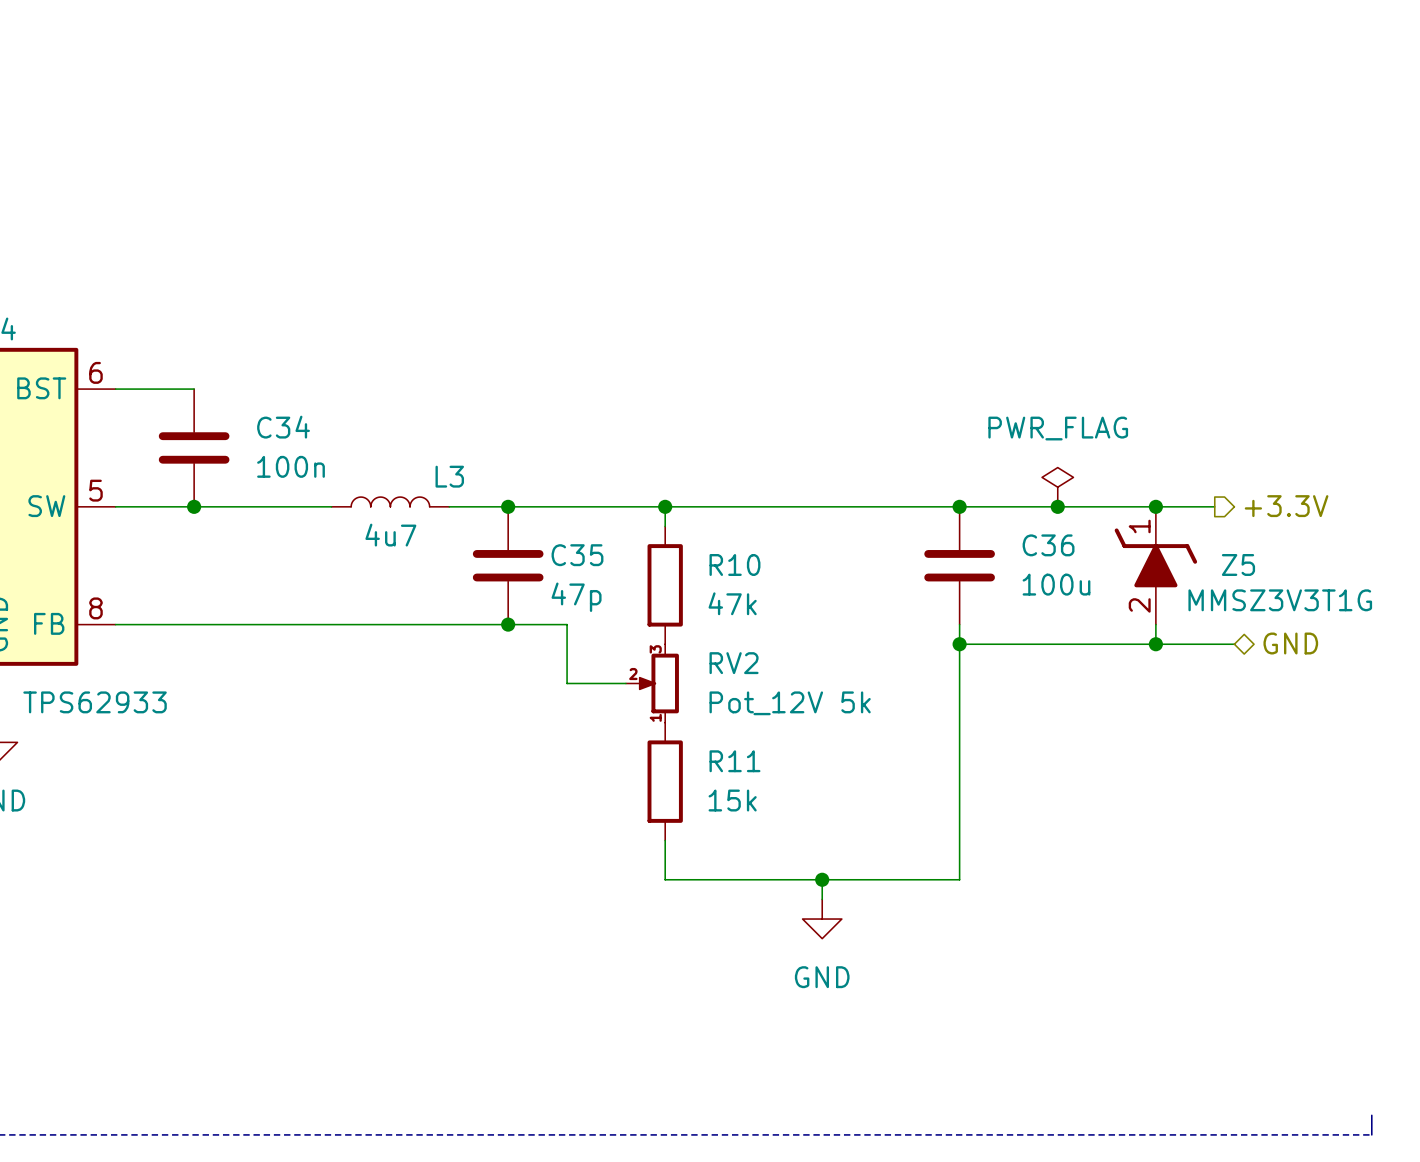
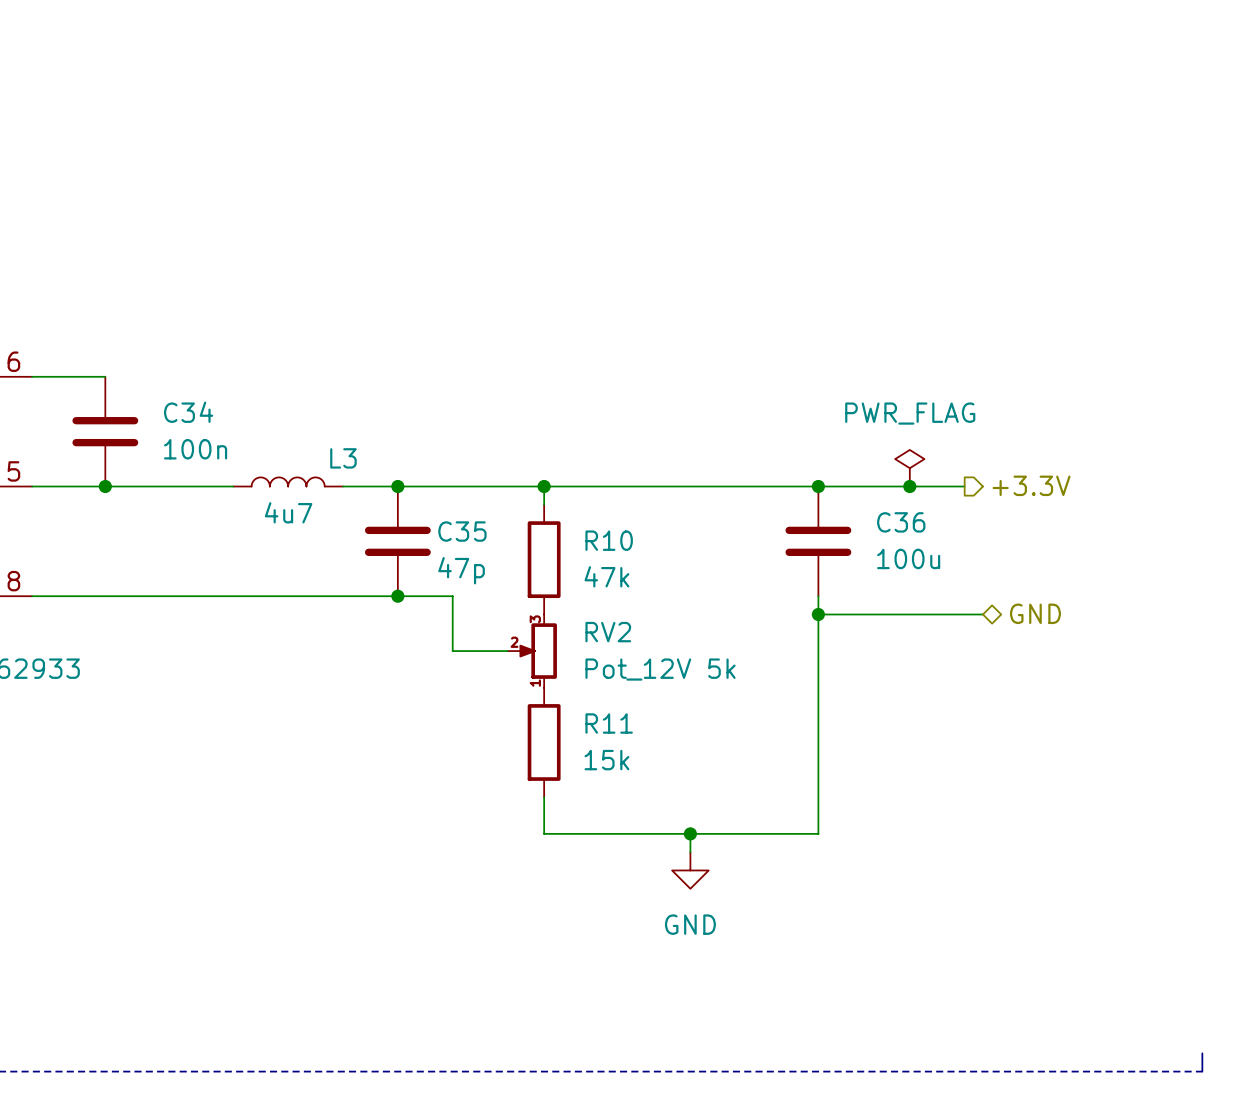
wire: (1116, 506) (1214, 506) -> none
junction: (1155, 506) -> none
hierarchical label position: +3.3V (1286, 506) -> +3.3V (1031, 485)
Z5: MMSZ3V3T1G (1155, 565) -> none
wire: (1155, 624) (1155, 644) -> none
hierarchical label position: GND (1290, 643) -> GND (1035, 613)
wire: (1136, 644) (1234, 644) -> none
junction: (1155, 644) -> none

